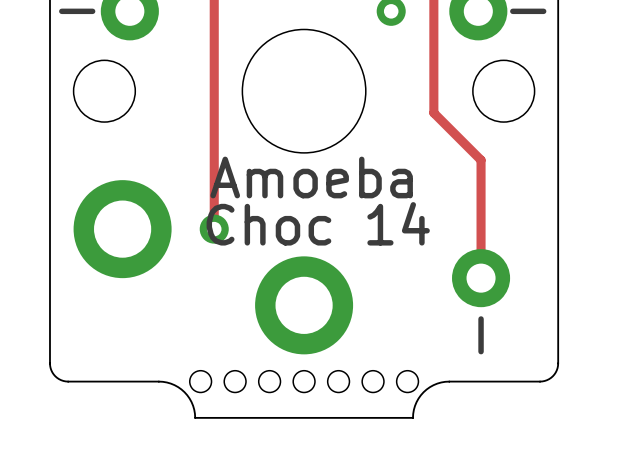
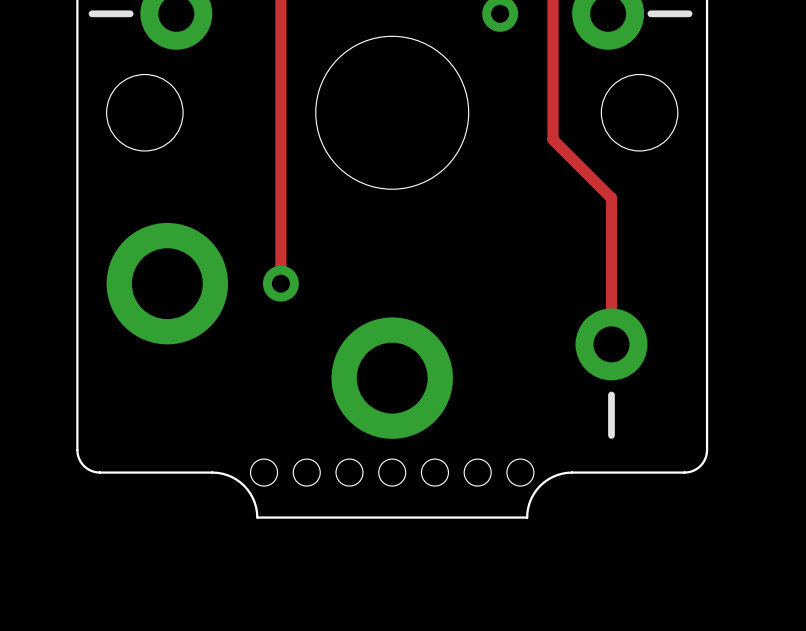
text: Amoeba (311, 177) -> none
text: Choc 14 (318, 223) -> none

